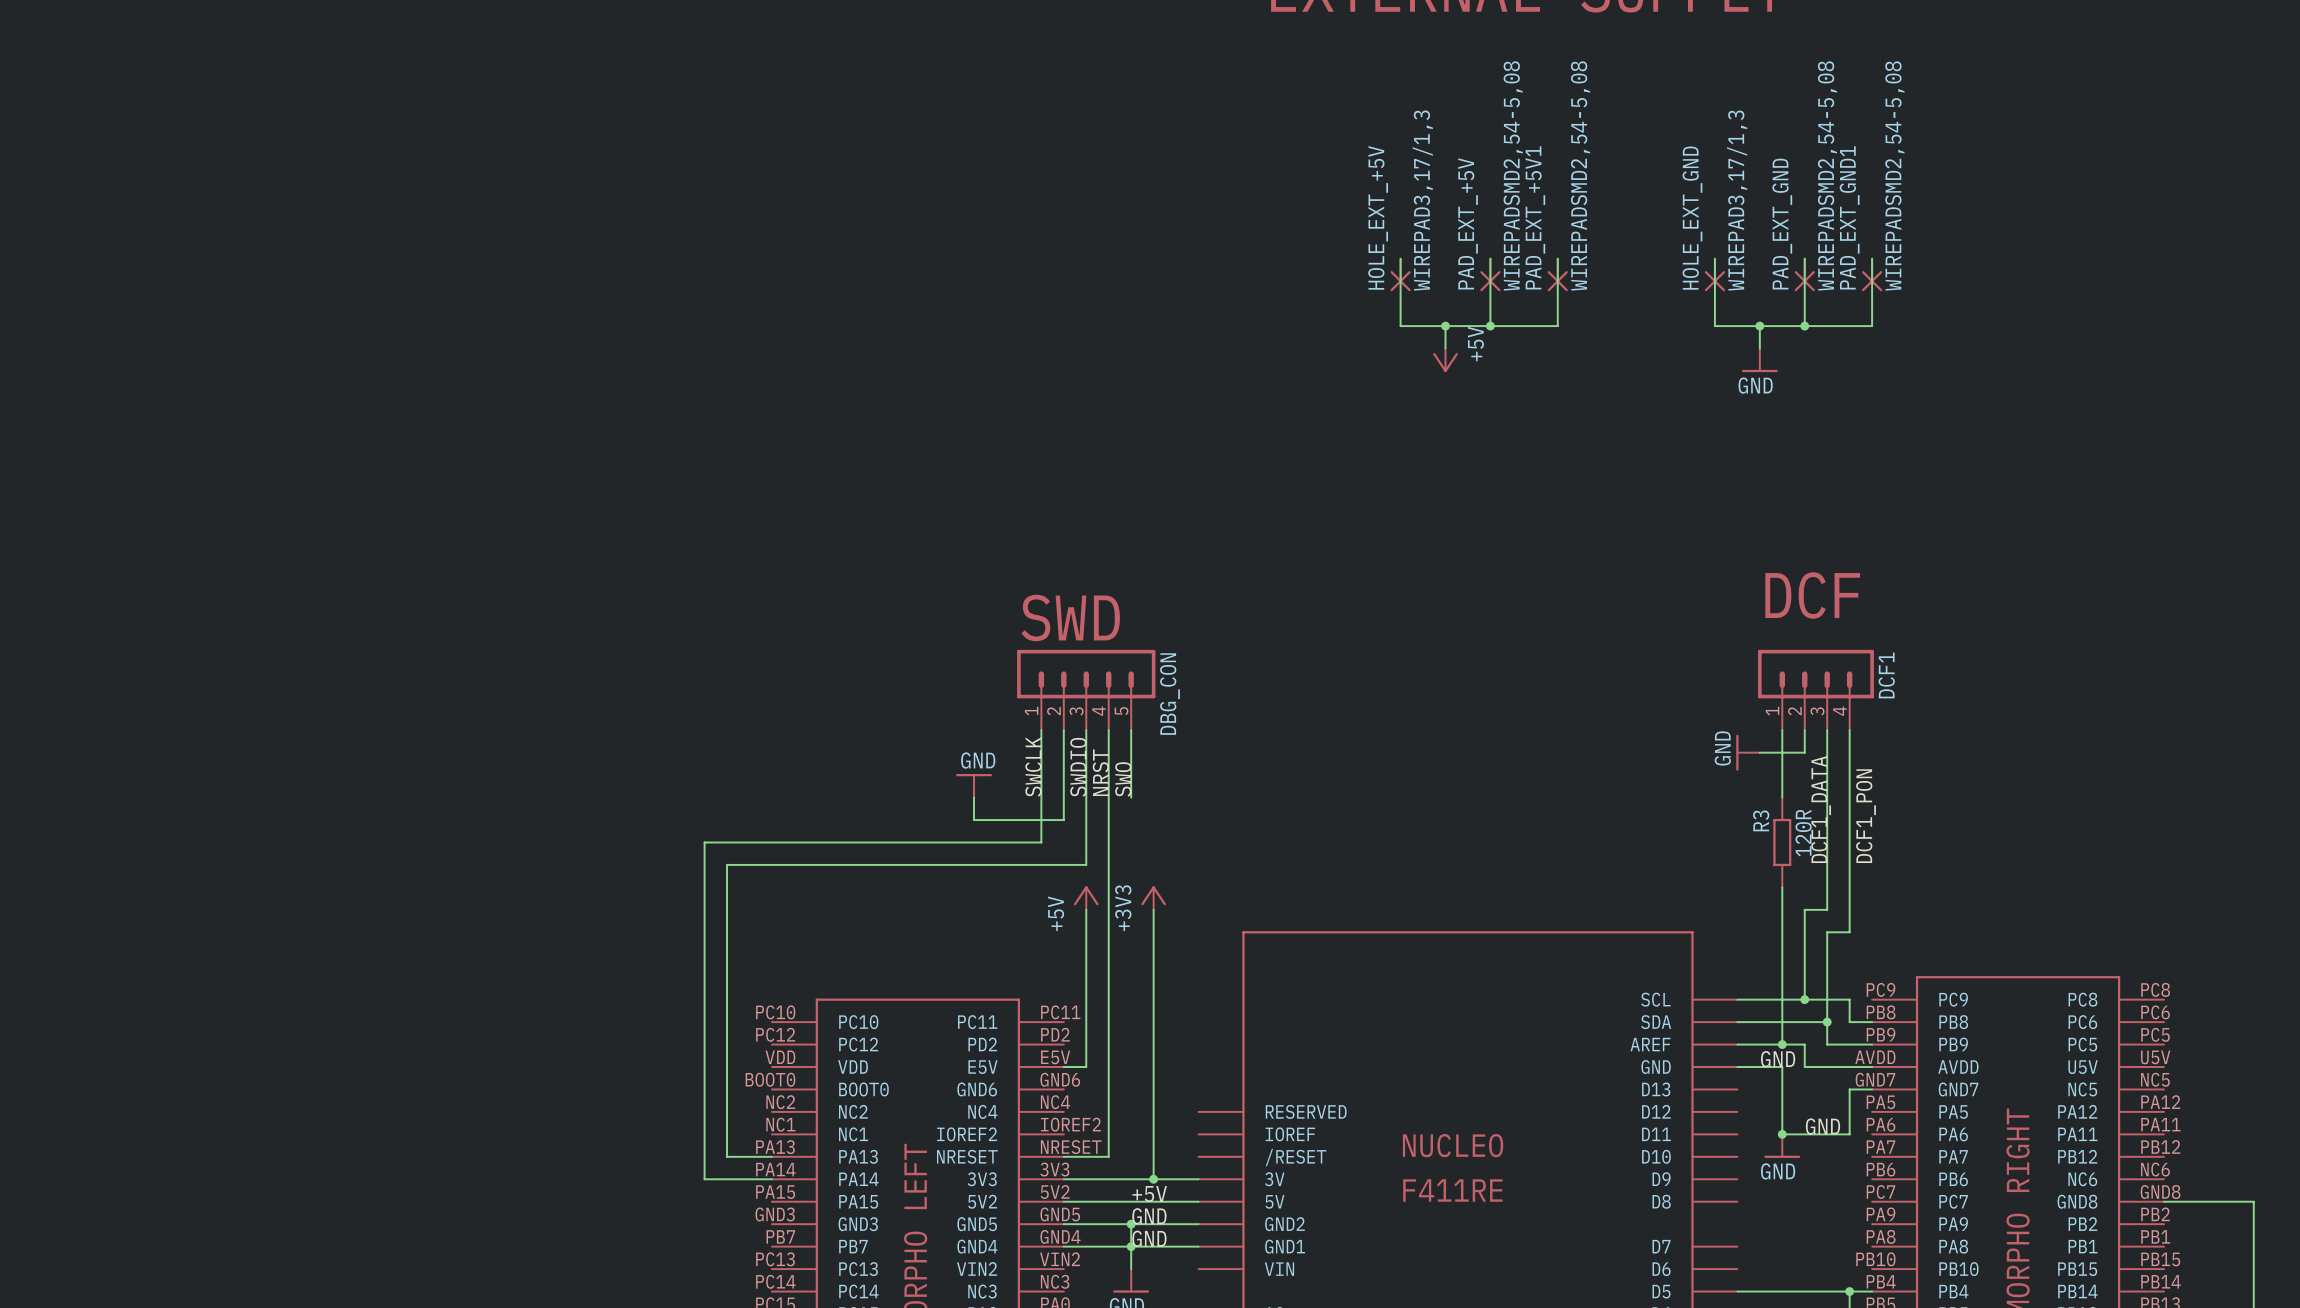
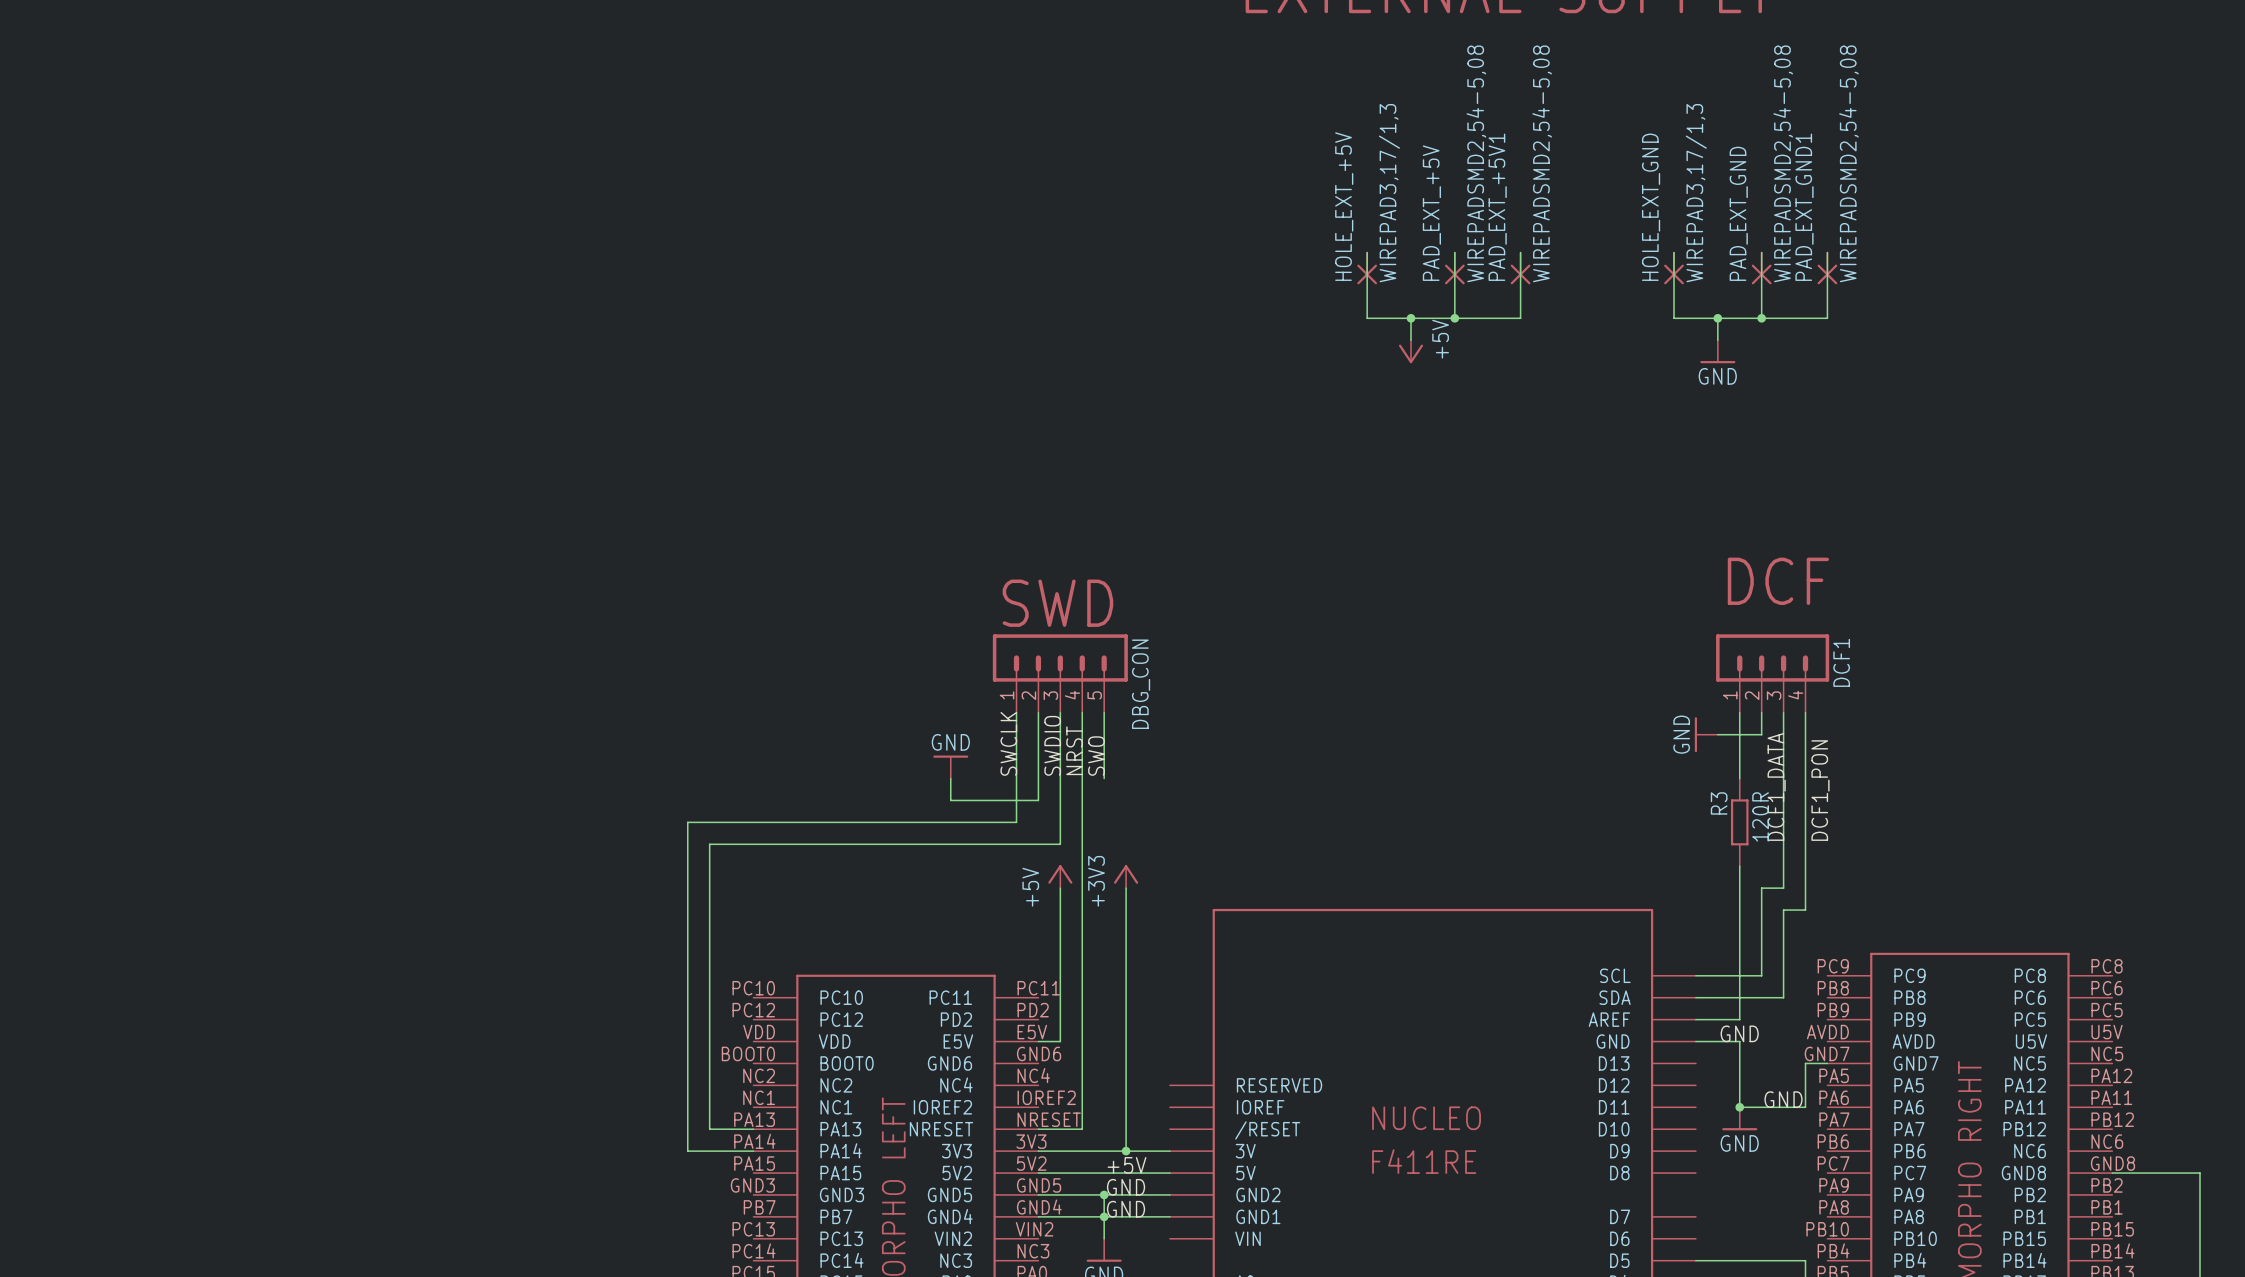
wire: (1804, 999) (1849, 999) (1849, 1022) (1872, 1022) -> none
junction: (1804, 999) -> none
wire: (1827, 1022) (1827, 1044) (1872, 1044) -> none
junction: (1827, 1022) -> none
wire: (1782, 1044) (1804, 1044) (1804, 1067) (1872, 1067) -> none
junction: (1782, 1044) -> none
wire: (1849, 1291) (1872, 1291) -> none
junction: (1849, 1291) -> none

